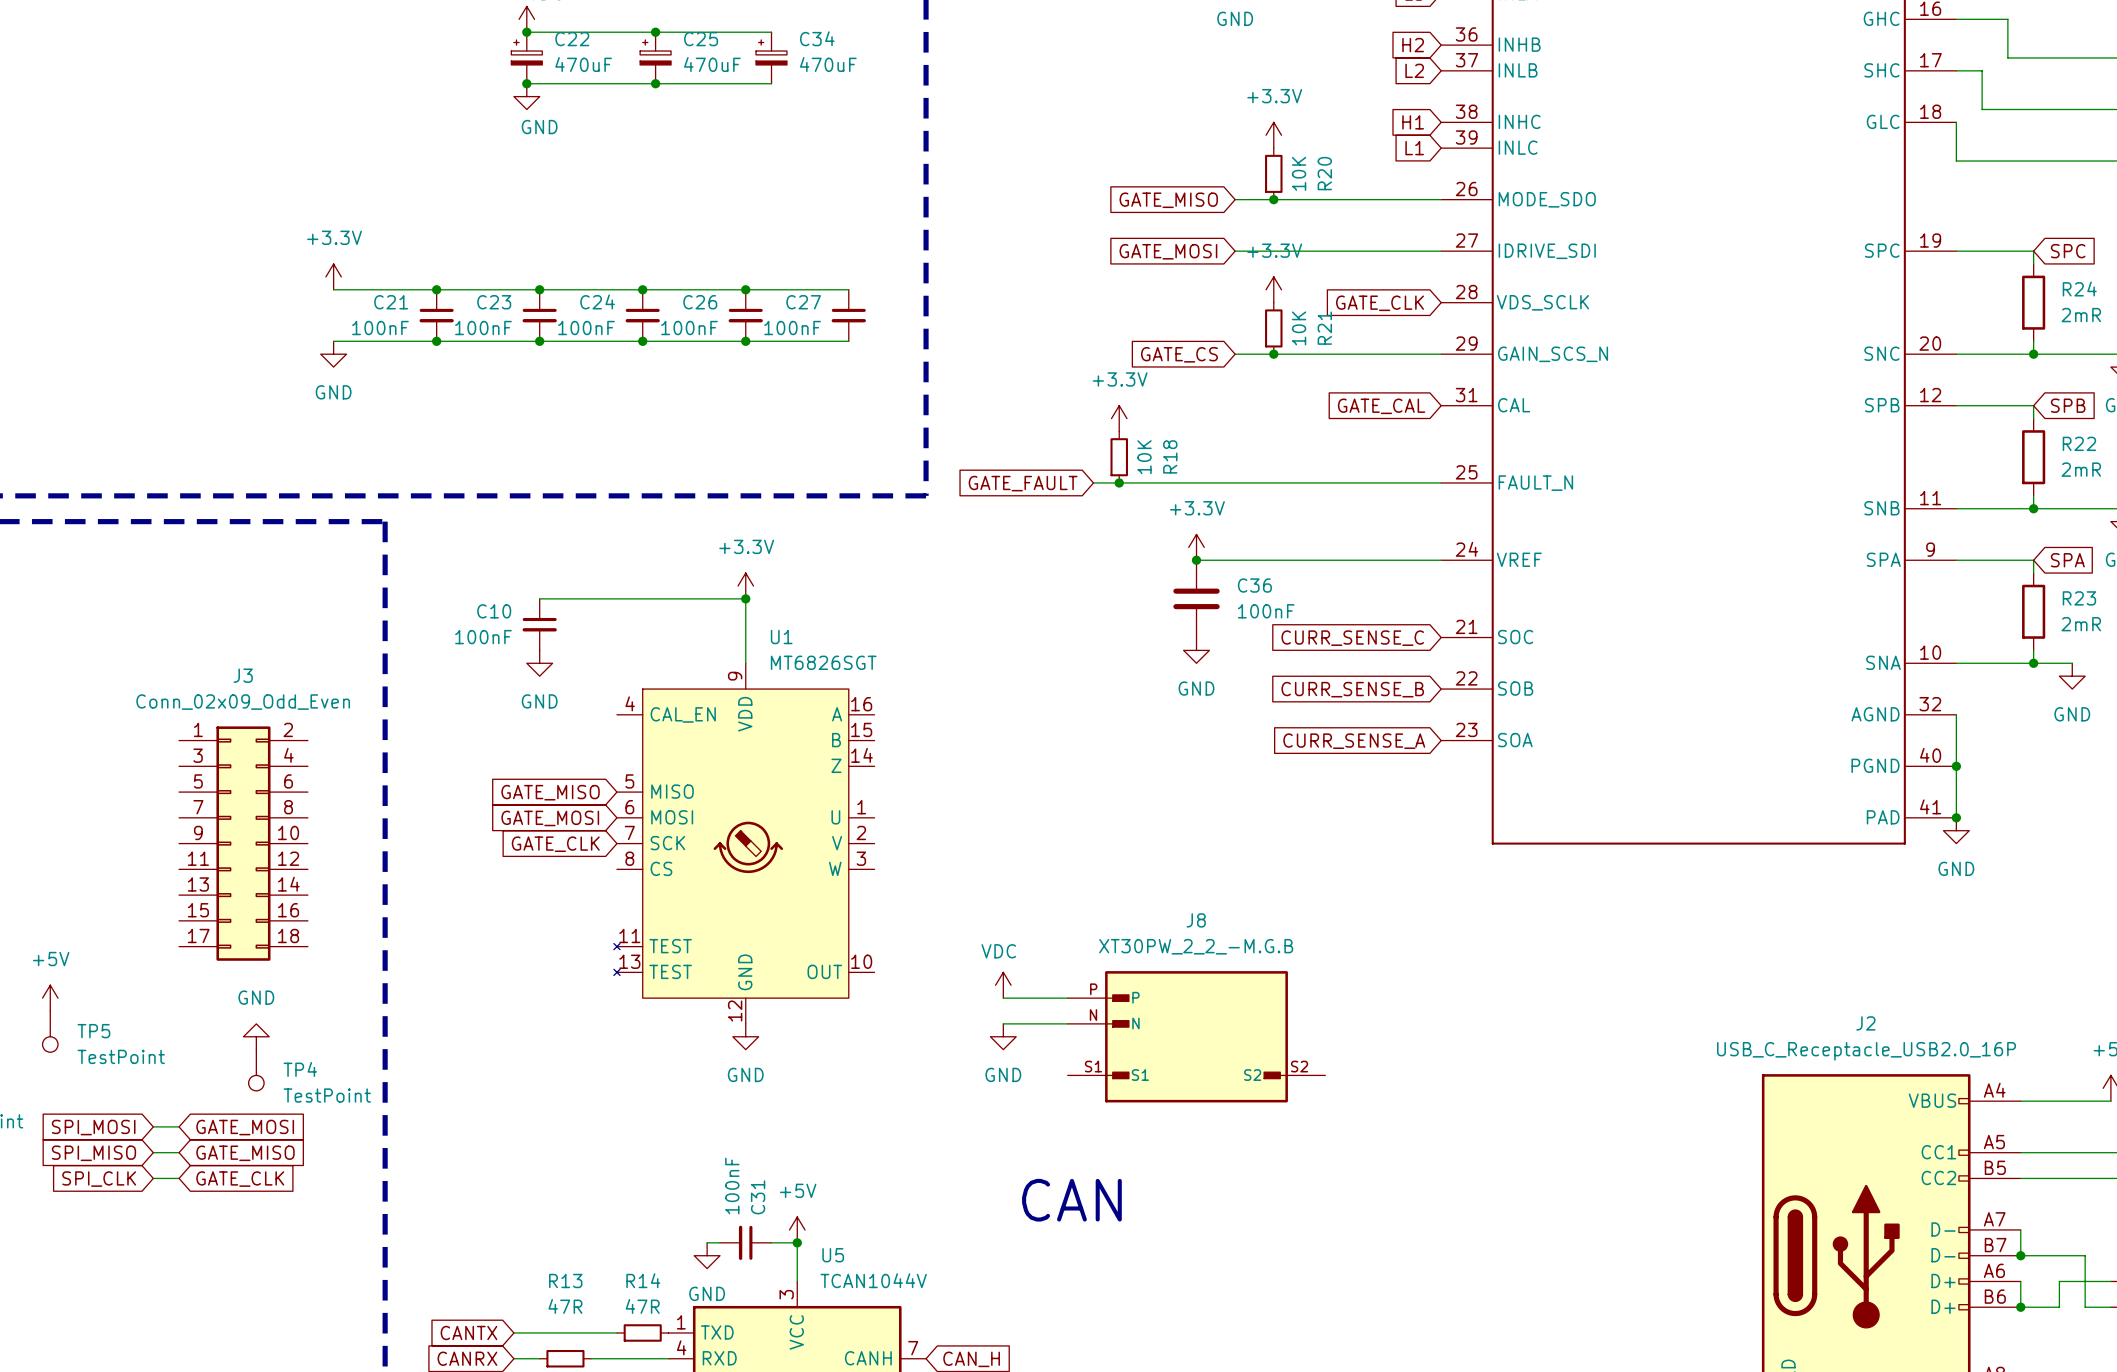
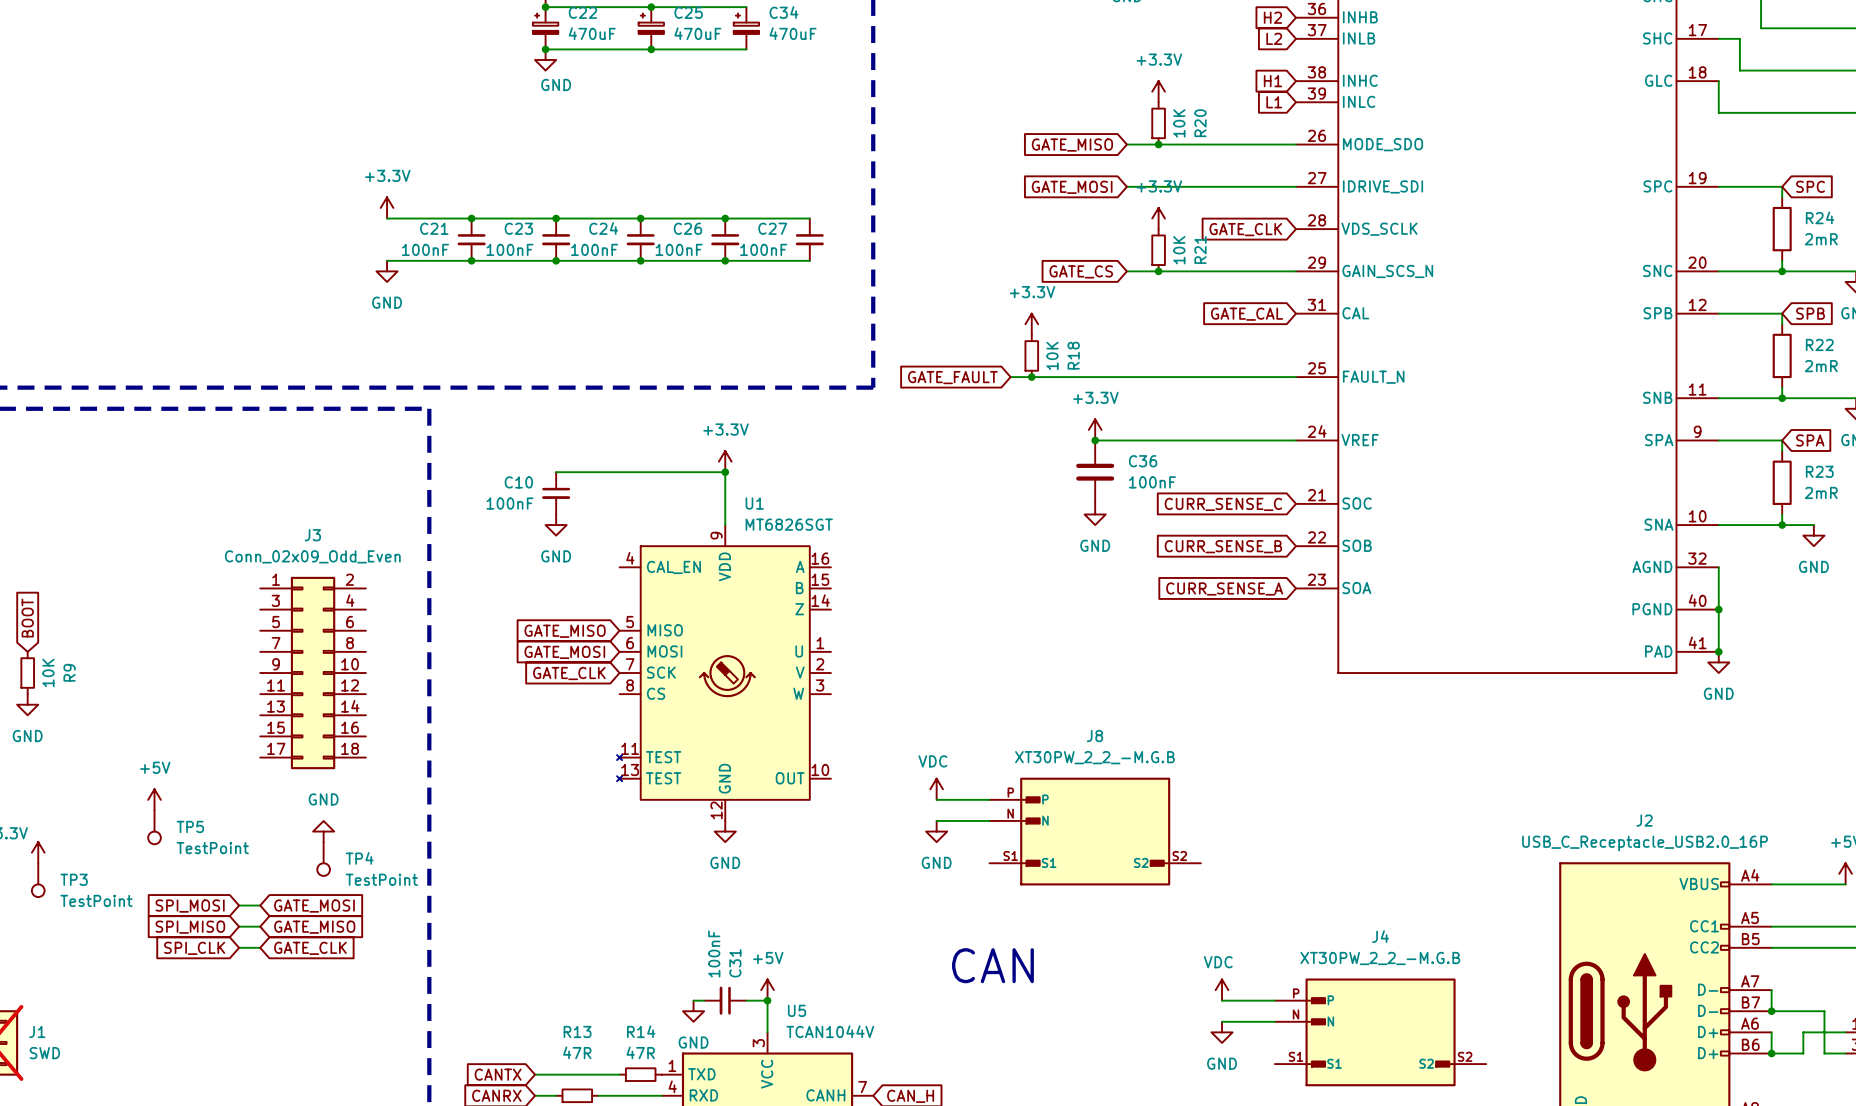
power symbol: none -> VDC (1222, 990)
wire: none -> (1222, 1000) (1274, 1000)
wire: none -> (1222, 1021) (1274, 1021)
power symbol: none -> GND (1222, 1032)
J4: none -> XT30PW_2_2_-M.G.B (1380, 1032)

